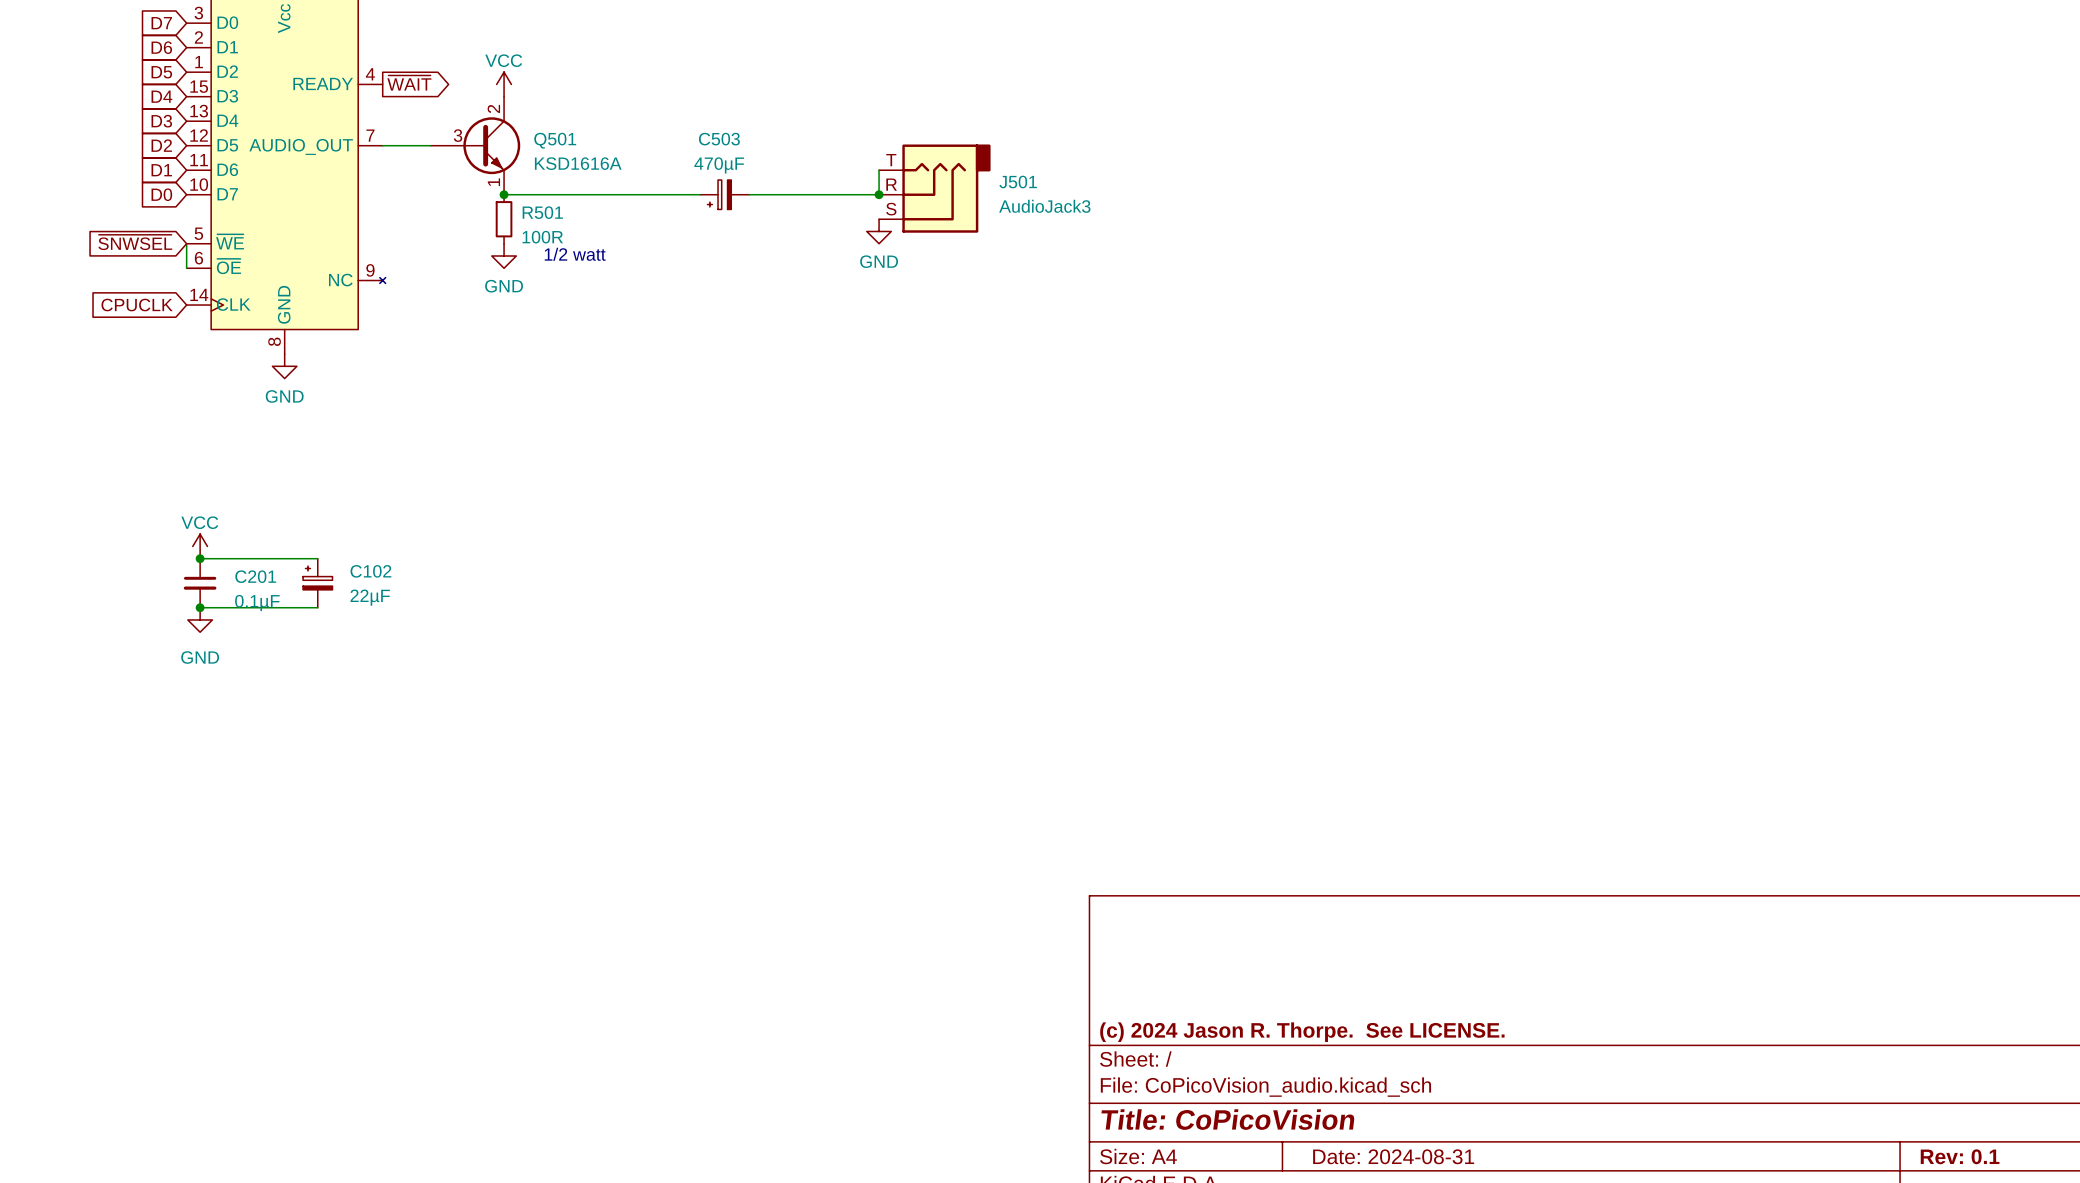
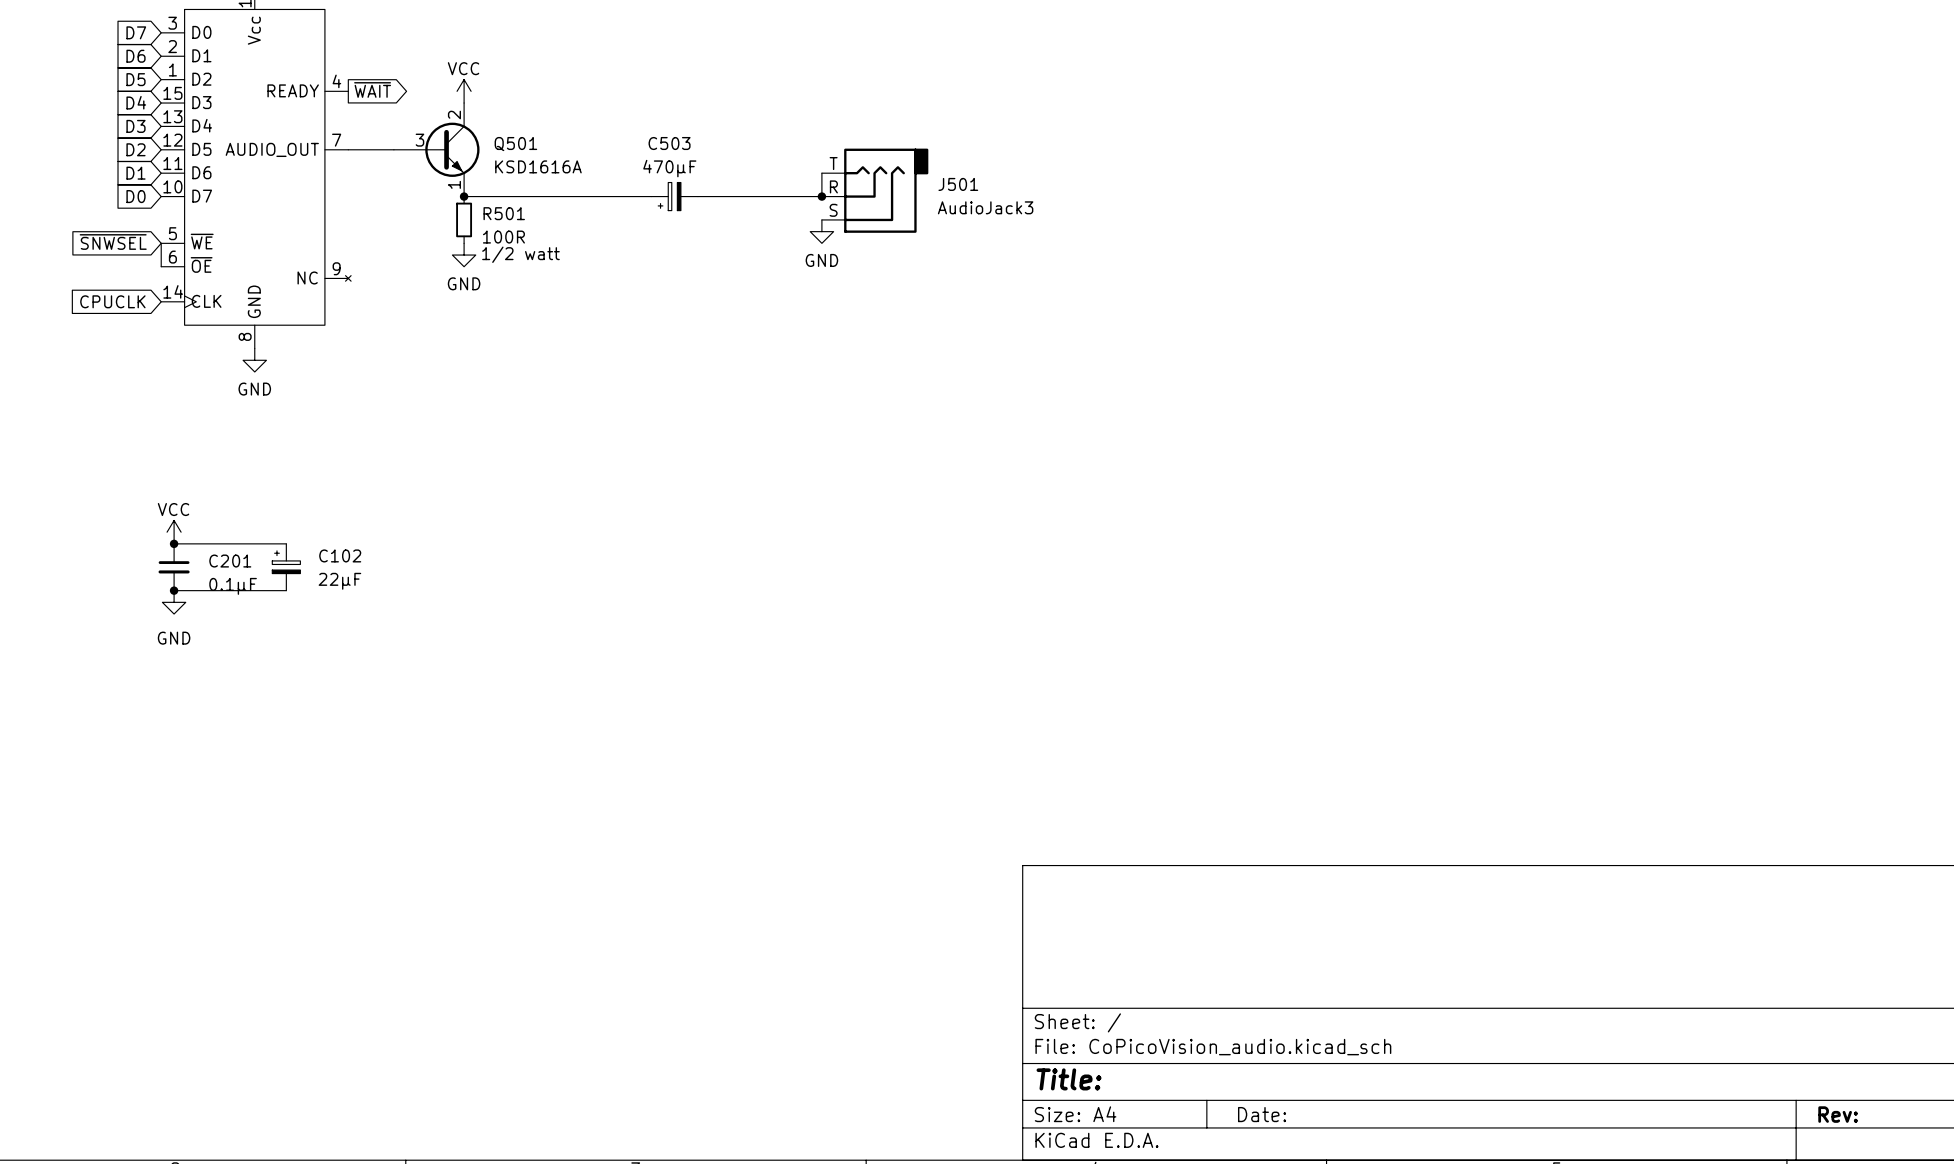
title block: (c) 2024 Jason R. Thorpe. See LICENSE. (1302, 1032) -> none
title block: Title: CoPicoVision (1227, 1119) -> Title: (1069, 1079)
title block: Date: 2024-08-31 (1393, 1156) -> Date: (1262, 1114)
title block: Rev: 0.1 (1960, 1156) -> Rev: (1838, 1114)

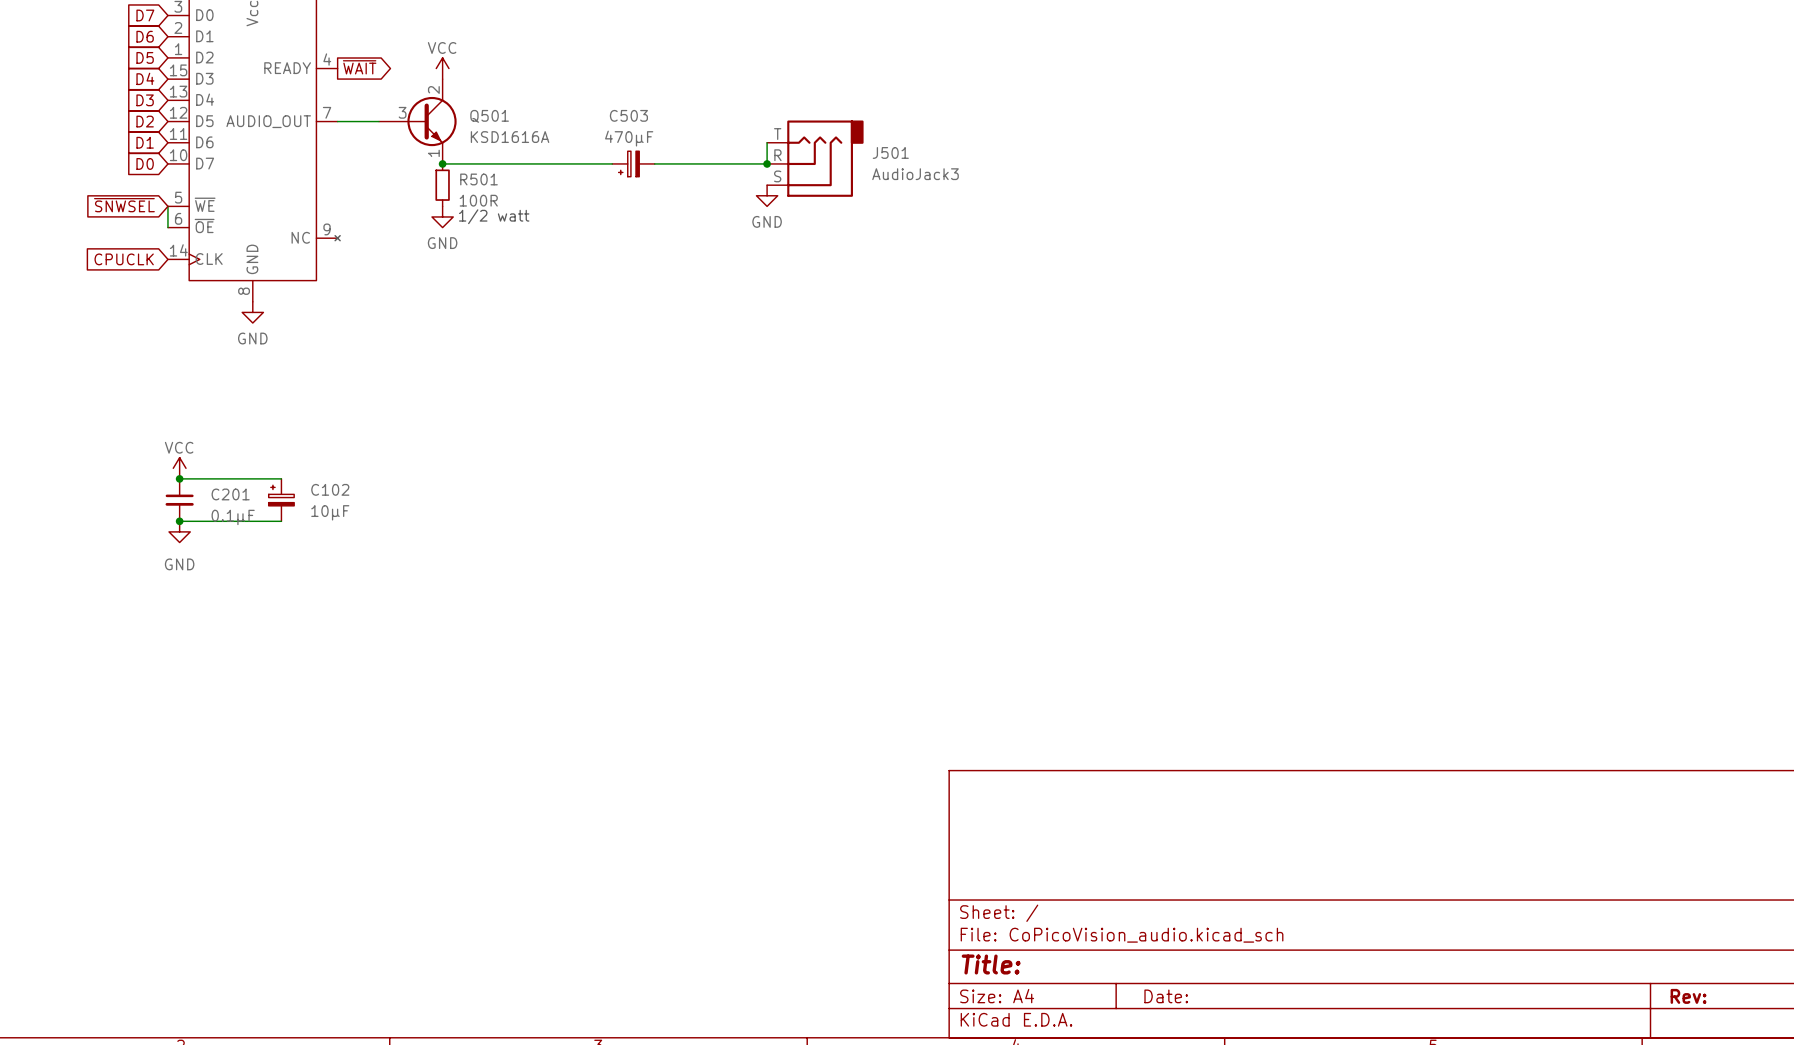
C102 value: 22µF (339, 581) -> 10µF (330, 512)

